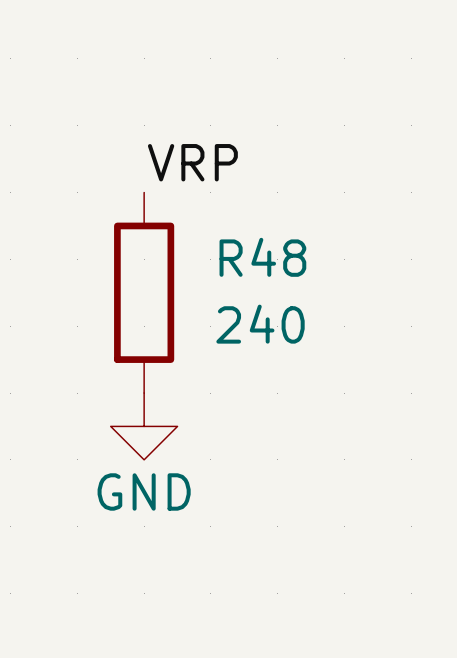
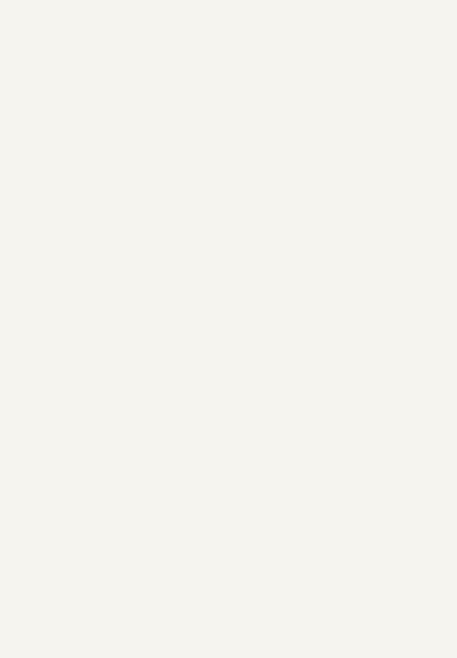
label: VRP (192, 162) -> none
R48: 240 (144, 292) -> none
power symbol: GND (144, 426) -> none

